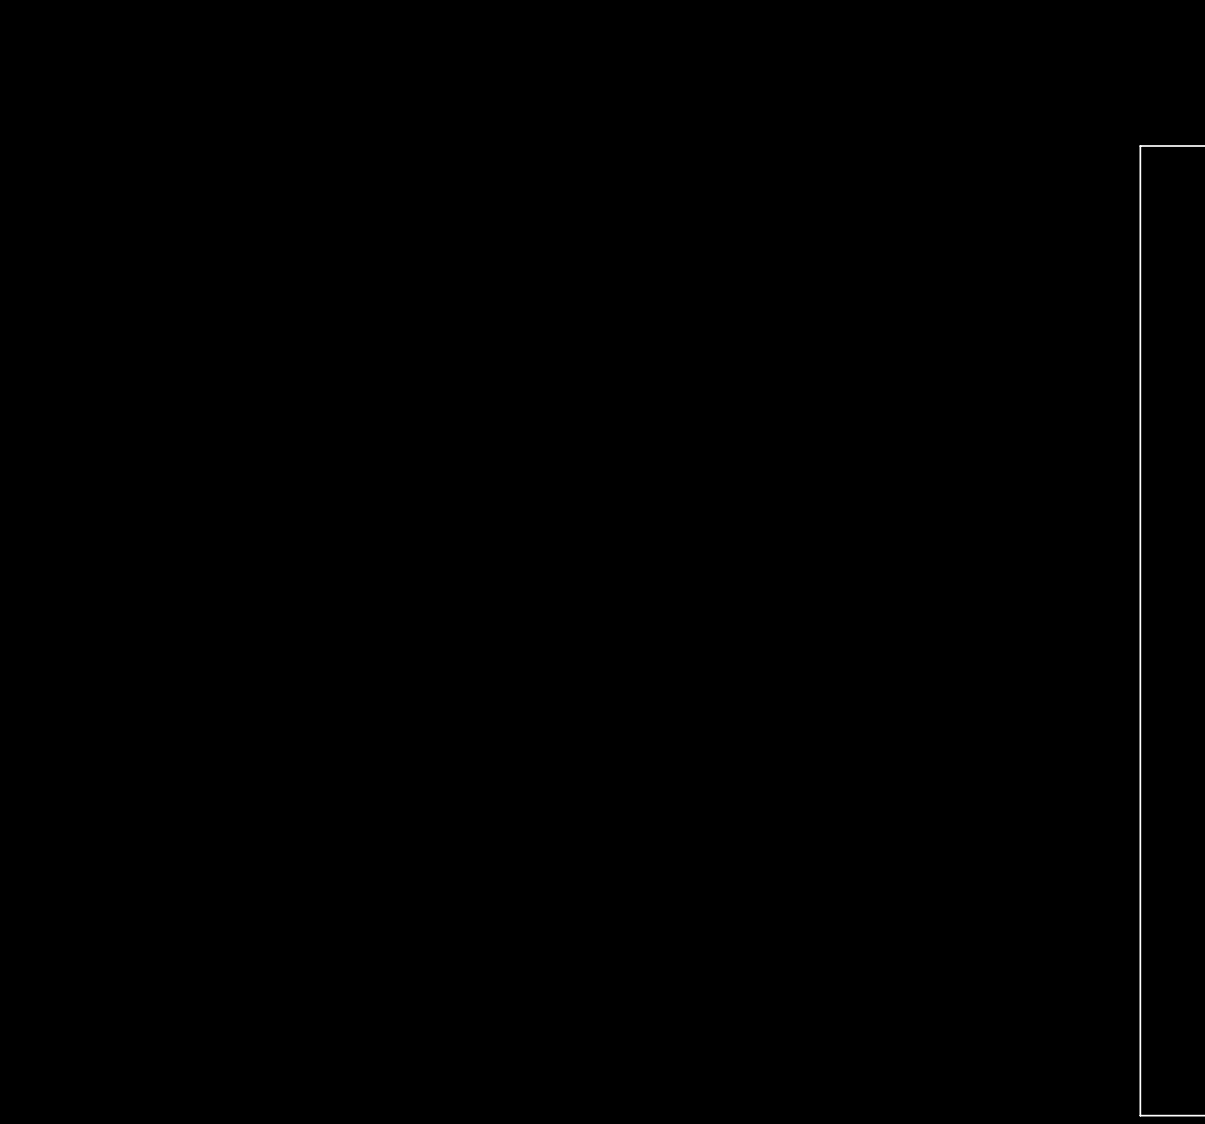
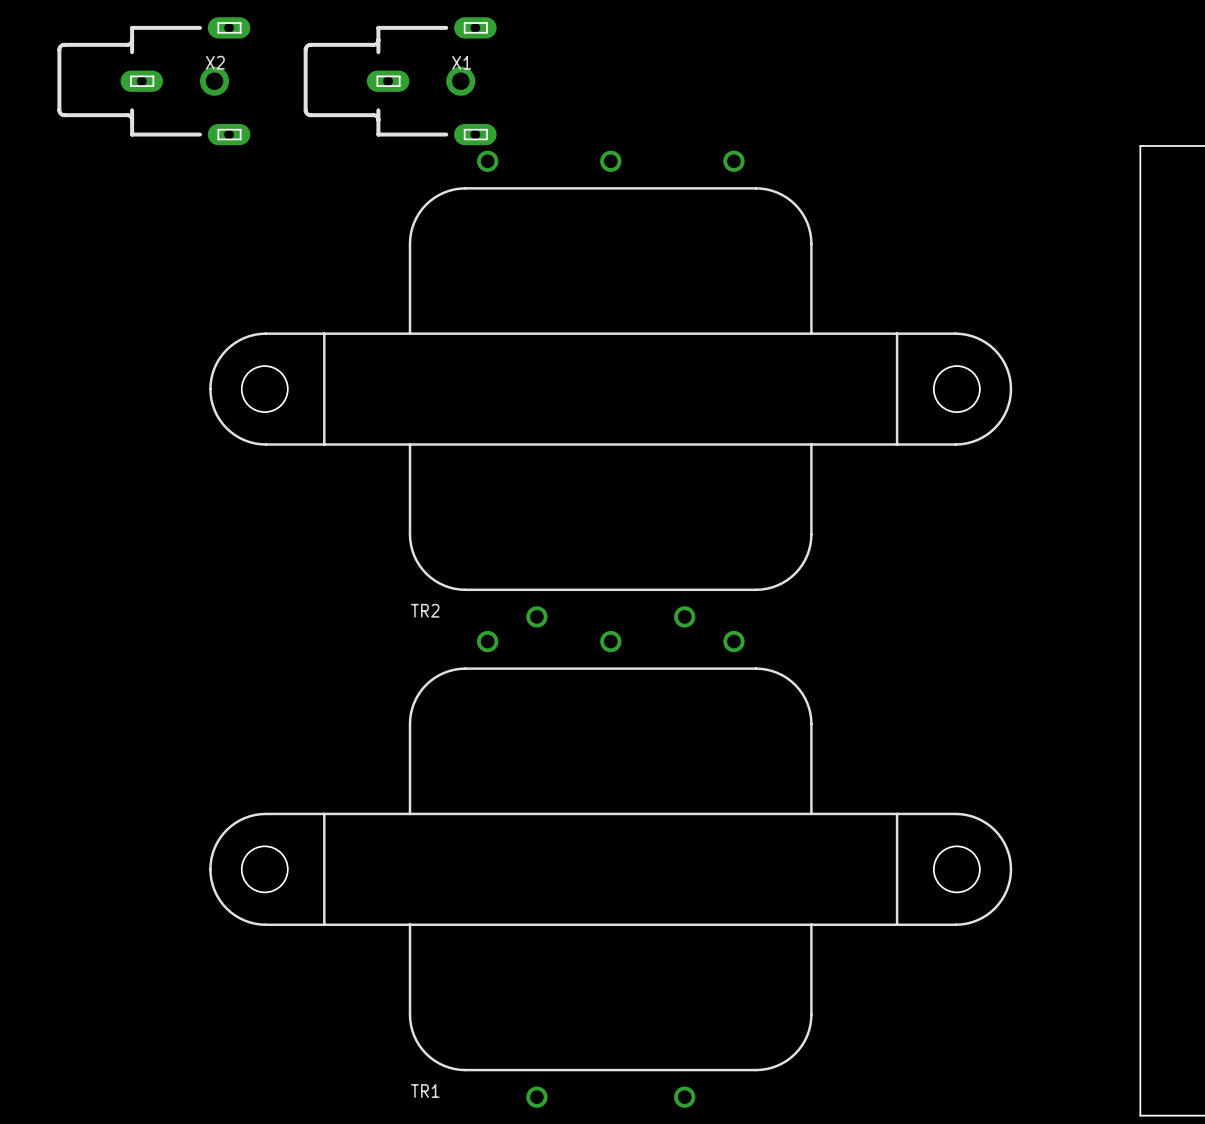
X2: none -> (153, 81)
X1: none -> (400, 81)
TR2: none -> (610, 389)
TR1: none -> (610, 869)

